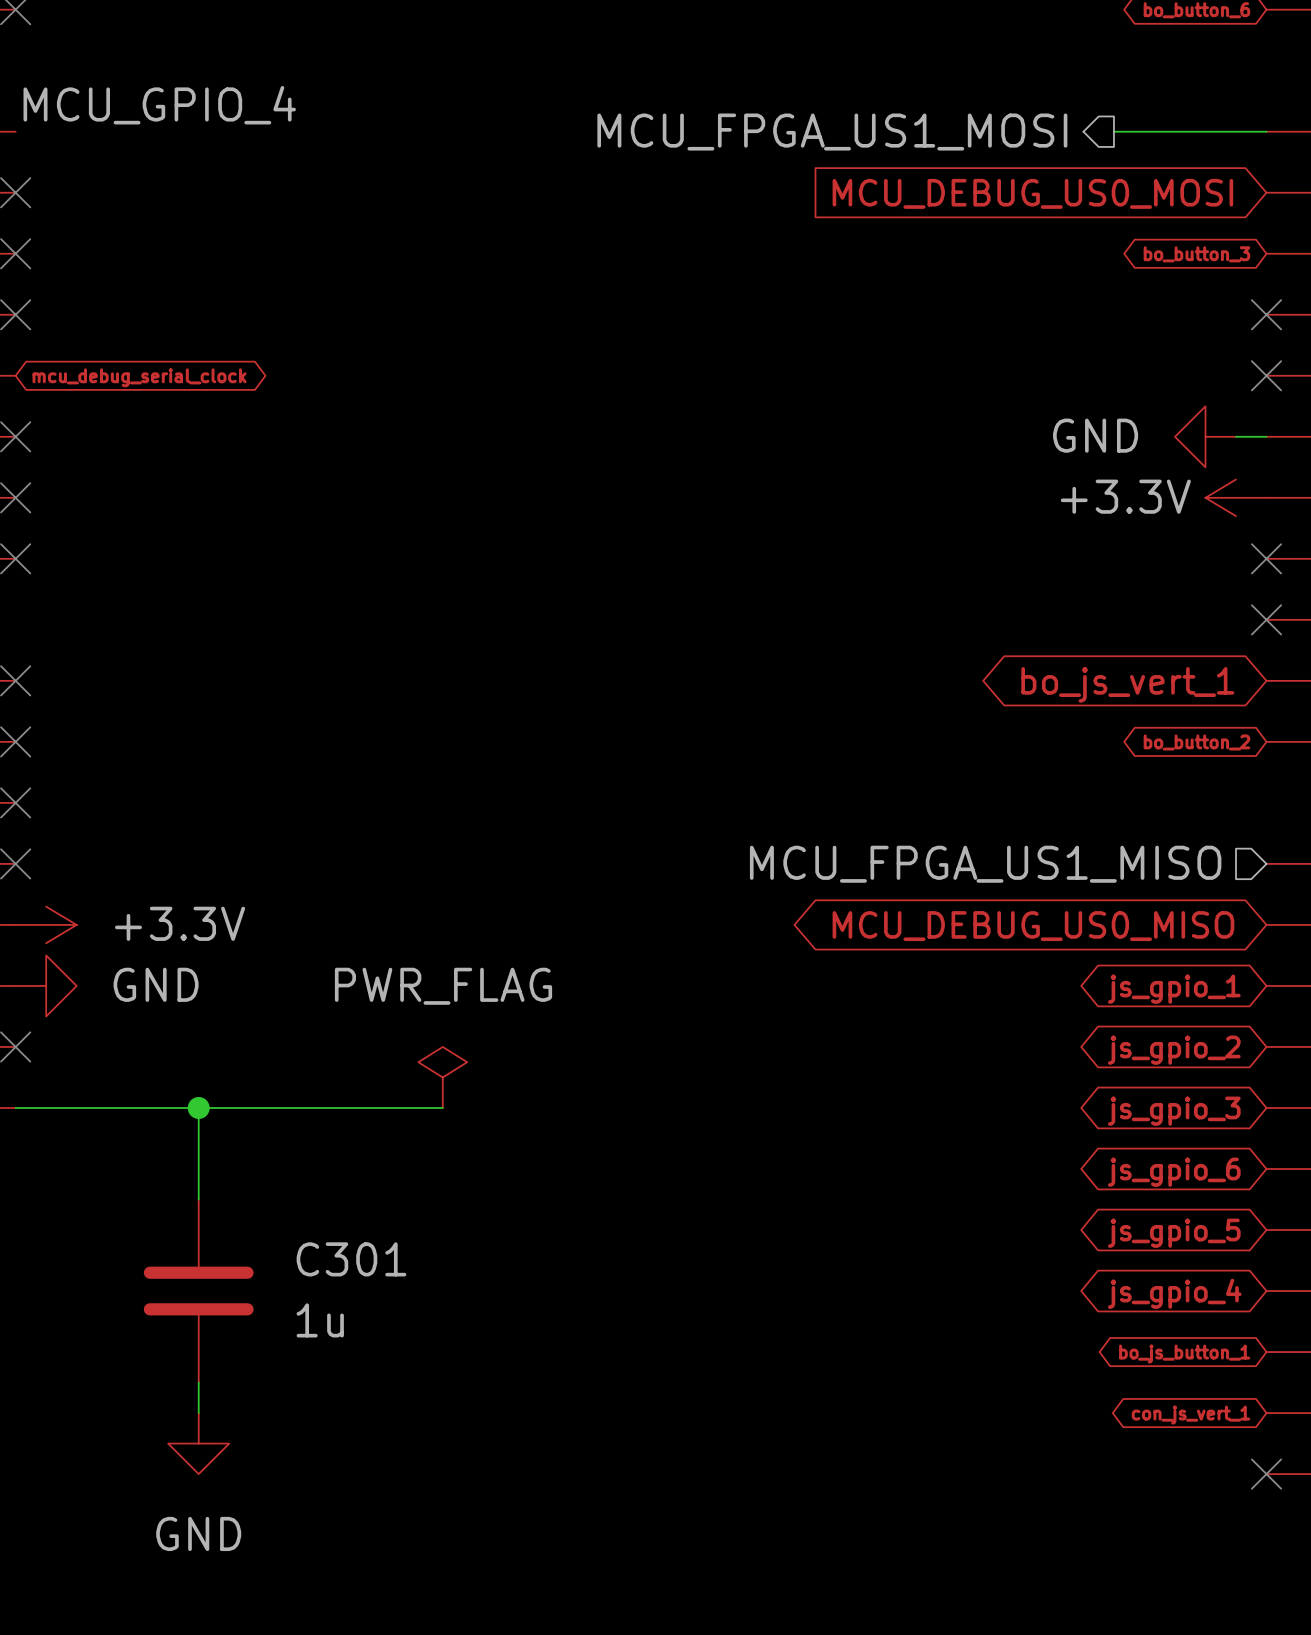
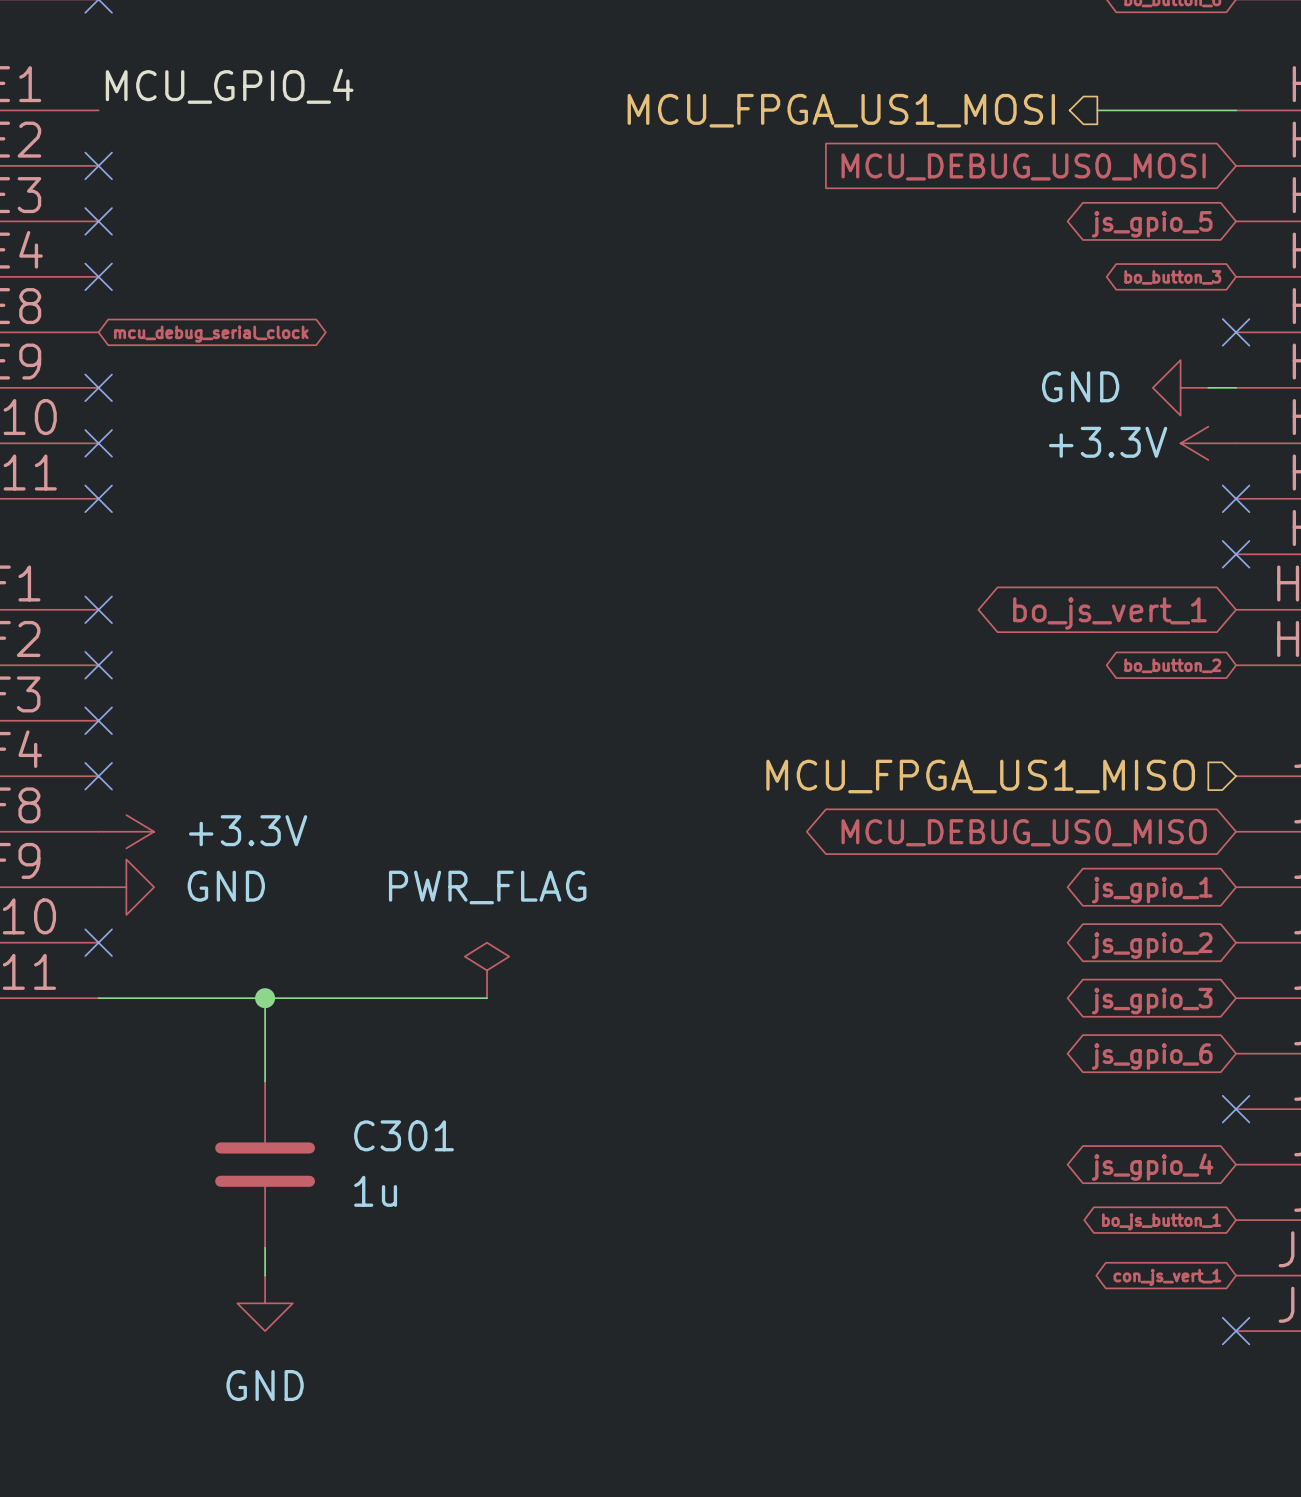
global label: bo_button_3 (1196, 254) -> js_gpio_5 (1152, 224)
no-connect mark: (1266, 314) -> none
global label: none -> bo_button_3 (1172, 277)
no-connect mark: none -> (1236, 1109)
global label: js_gpio_5 (1174, 1233) -> none

